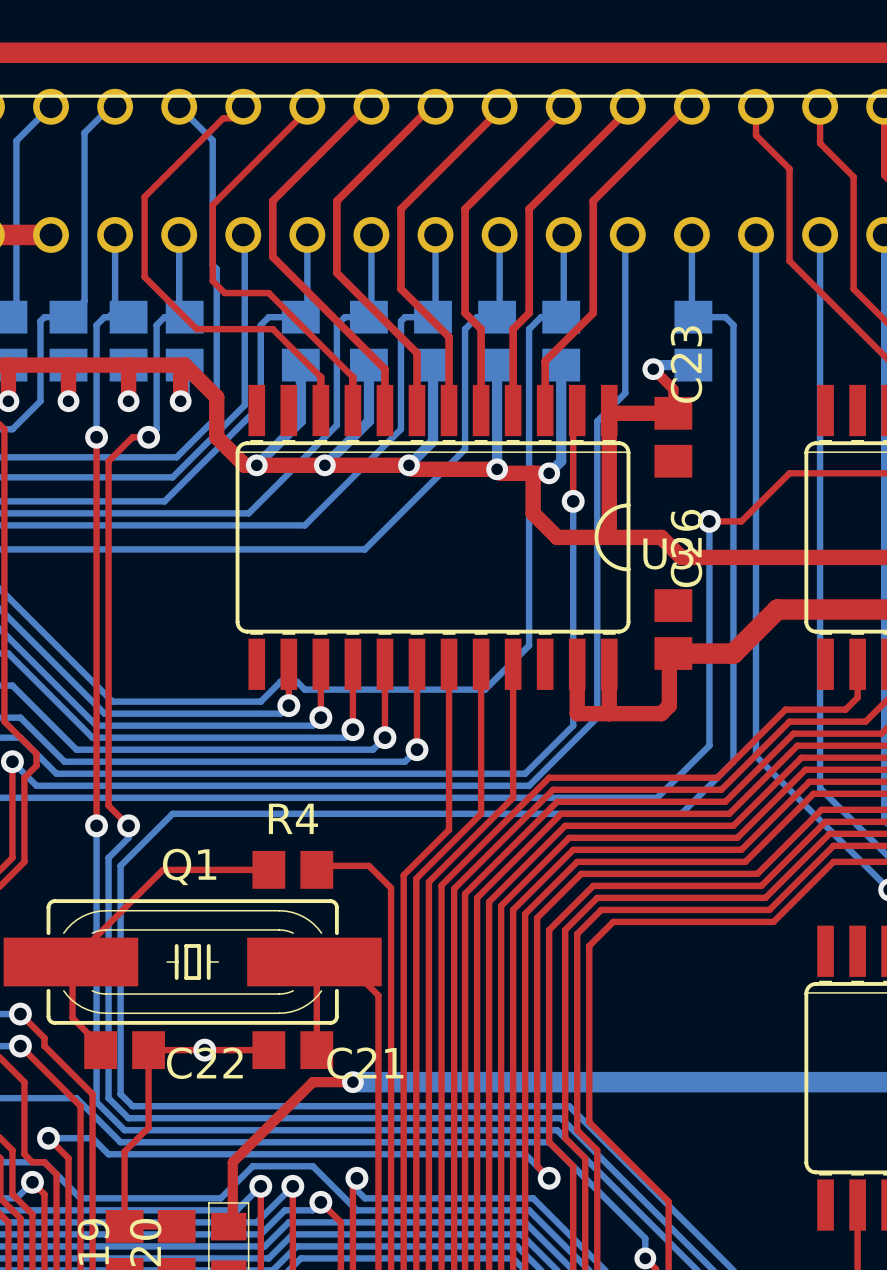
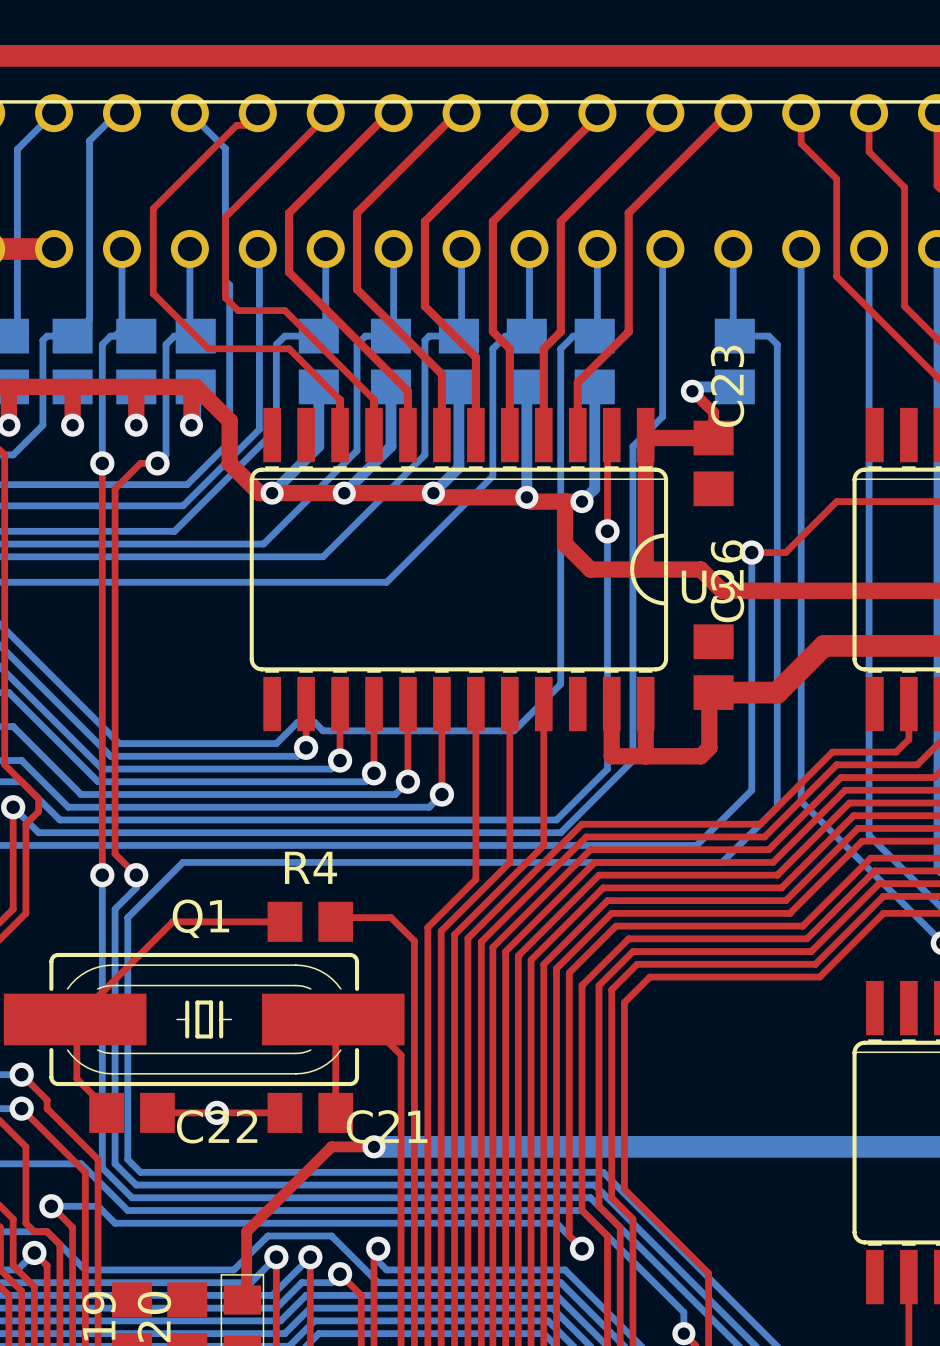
top track: (148, 1050) (148, 1127) (124, 1151) (124, 1226) (176, 1226) -> none

